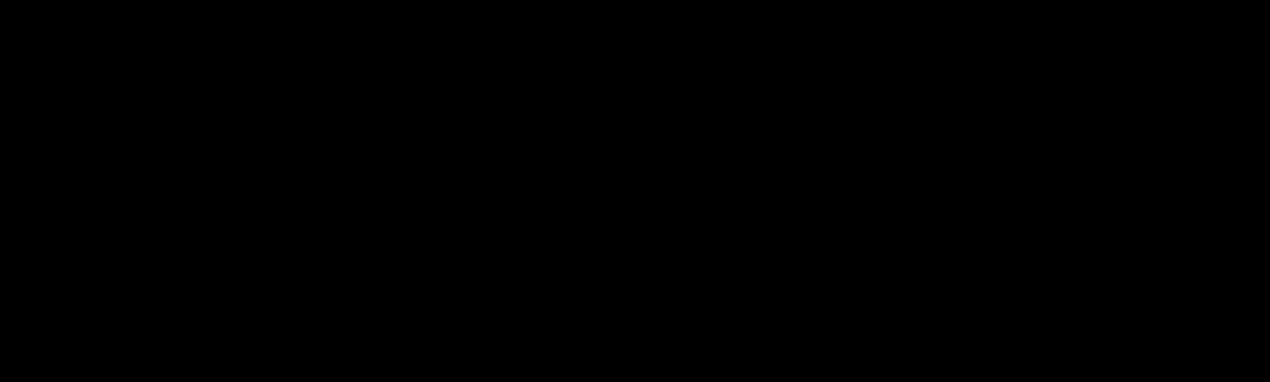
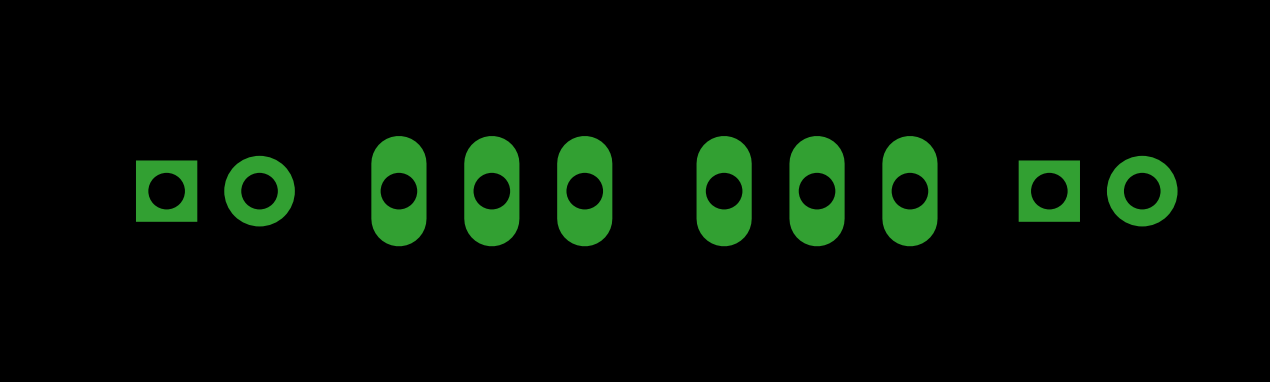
part: none -> (215, 191)
part: none -> (491, 191)
part: none -> (817, 191)
part: none -> (1098, 191)

